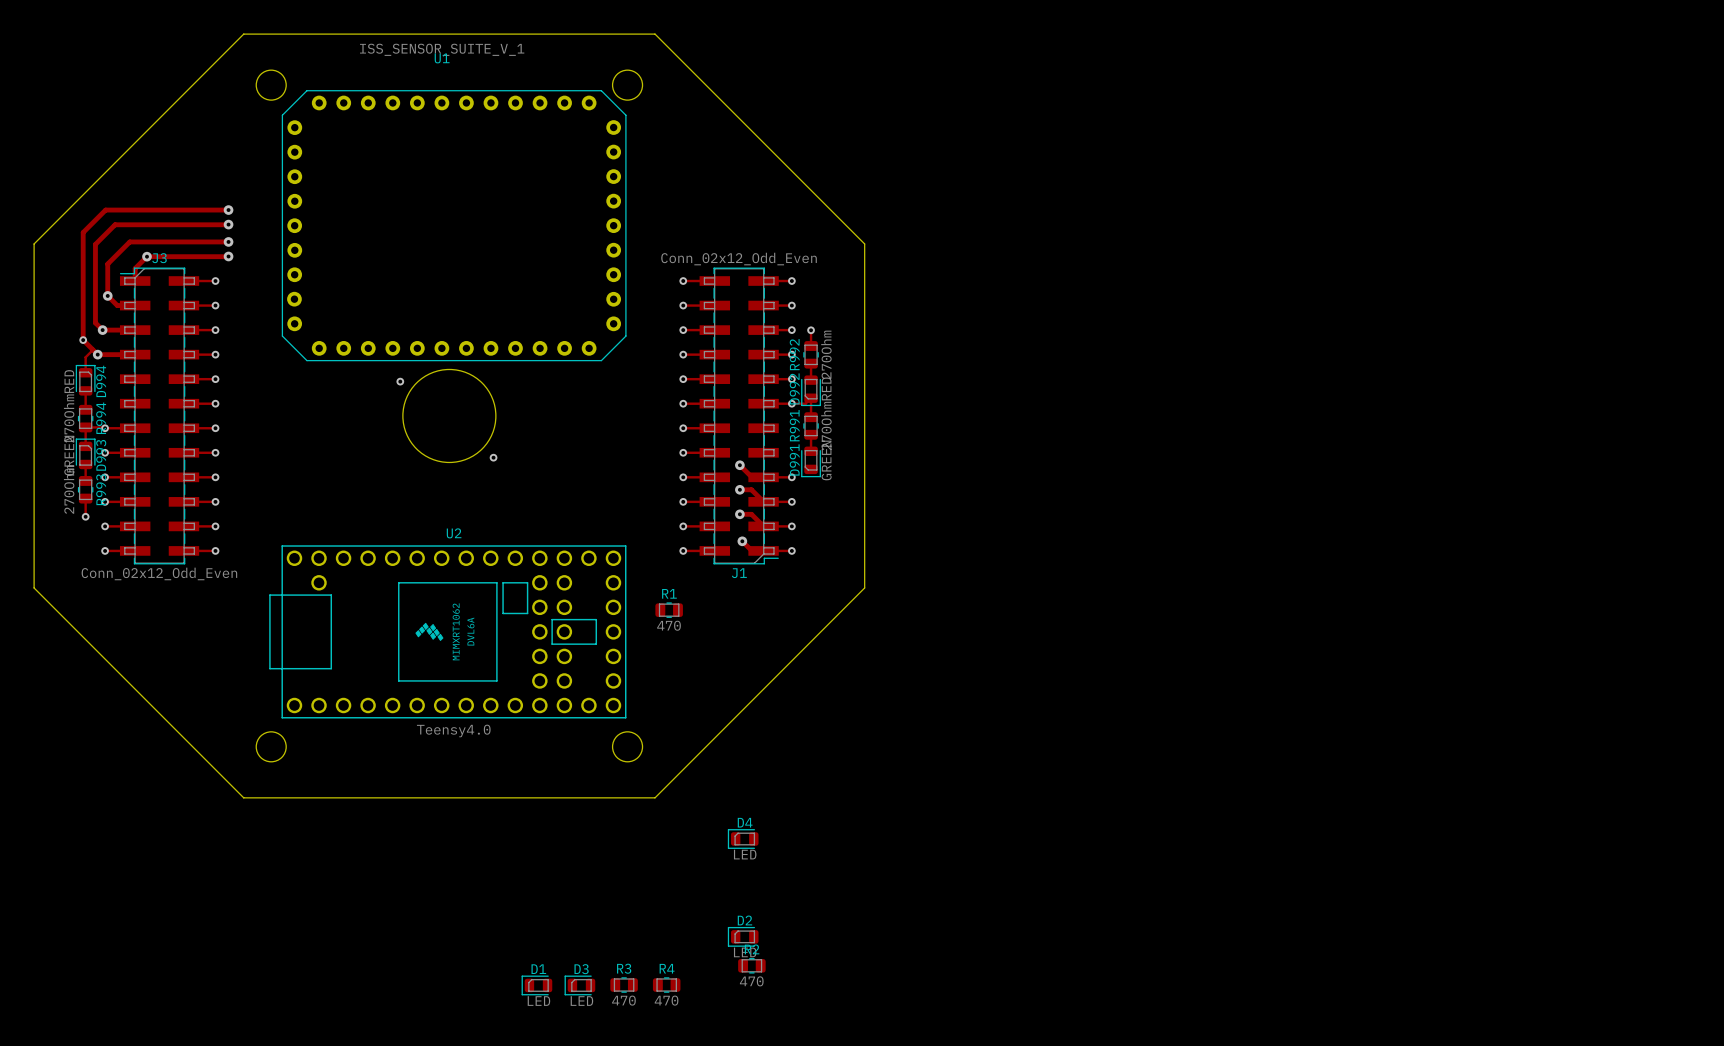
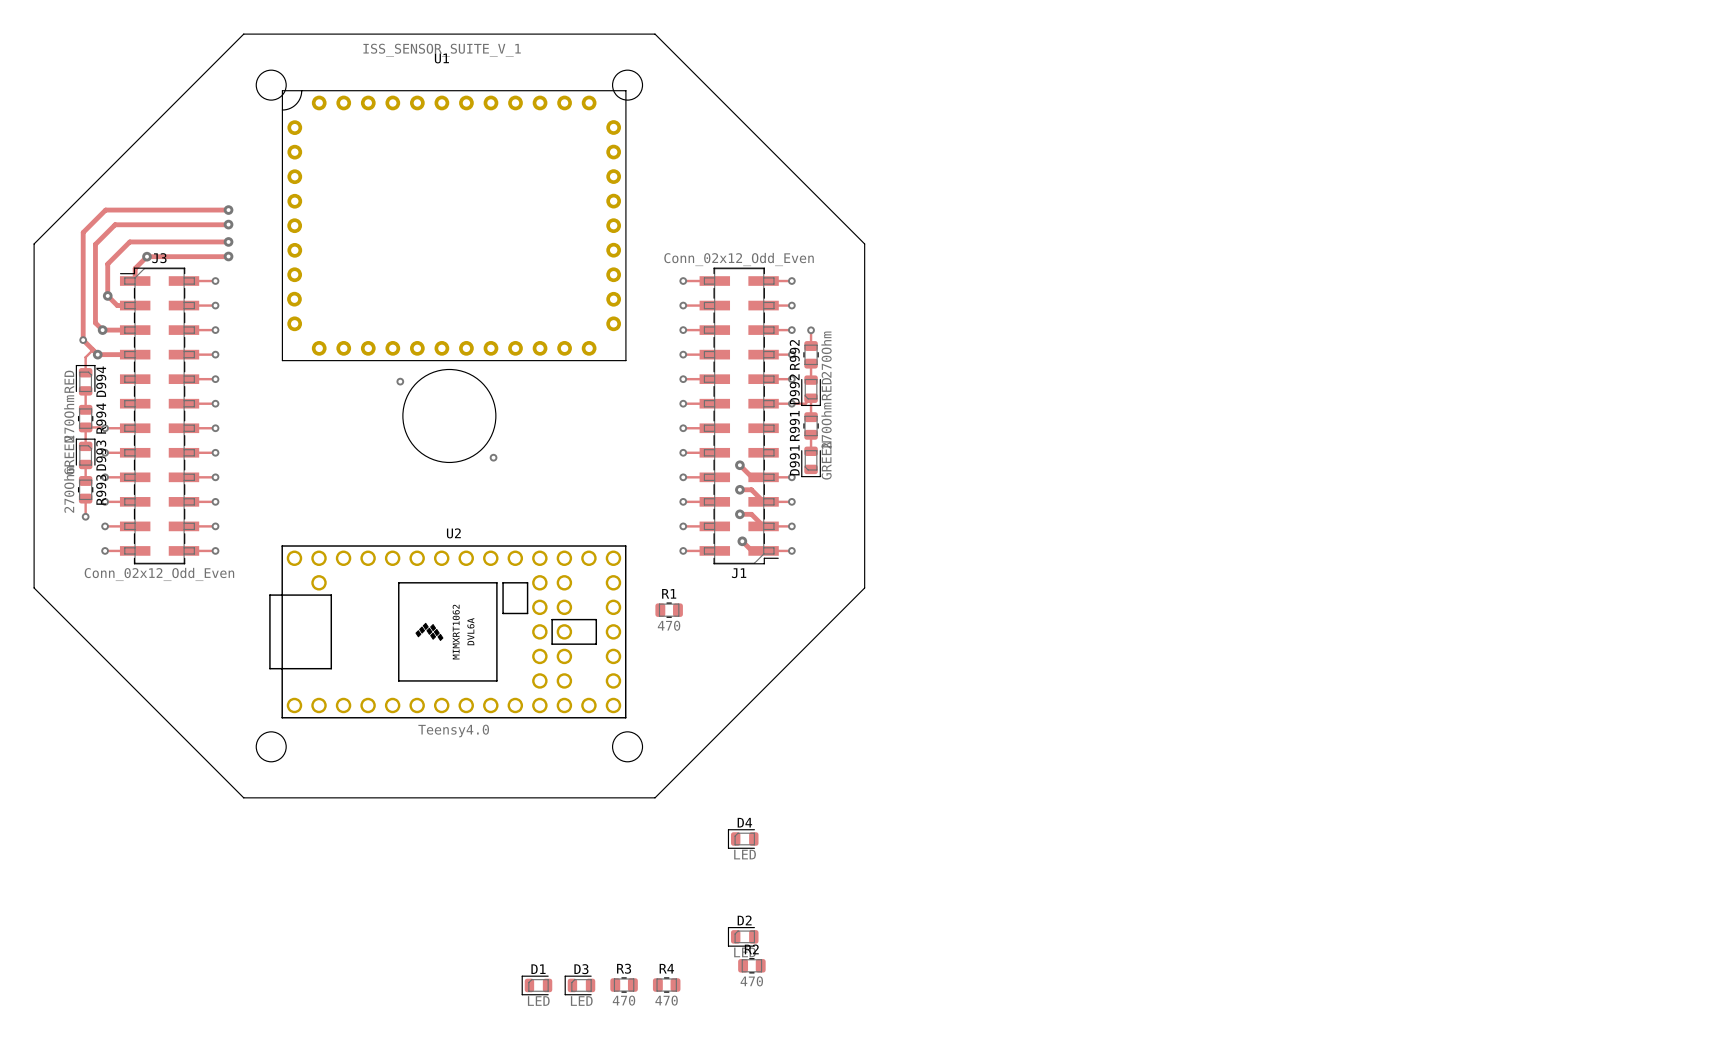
U1 footprint: [281, 90, 627, 362] -> [281, 90, 627, 362]

